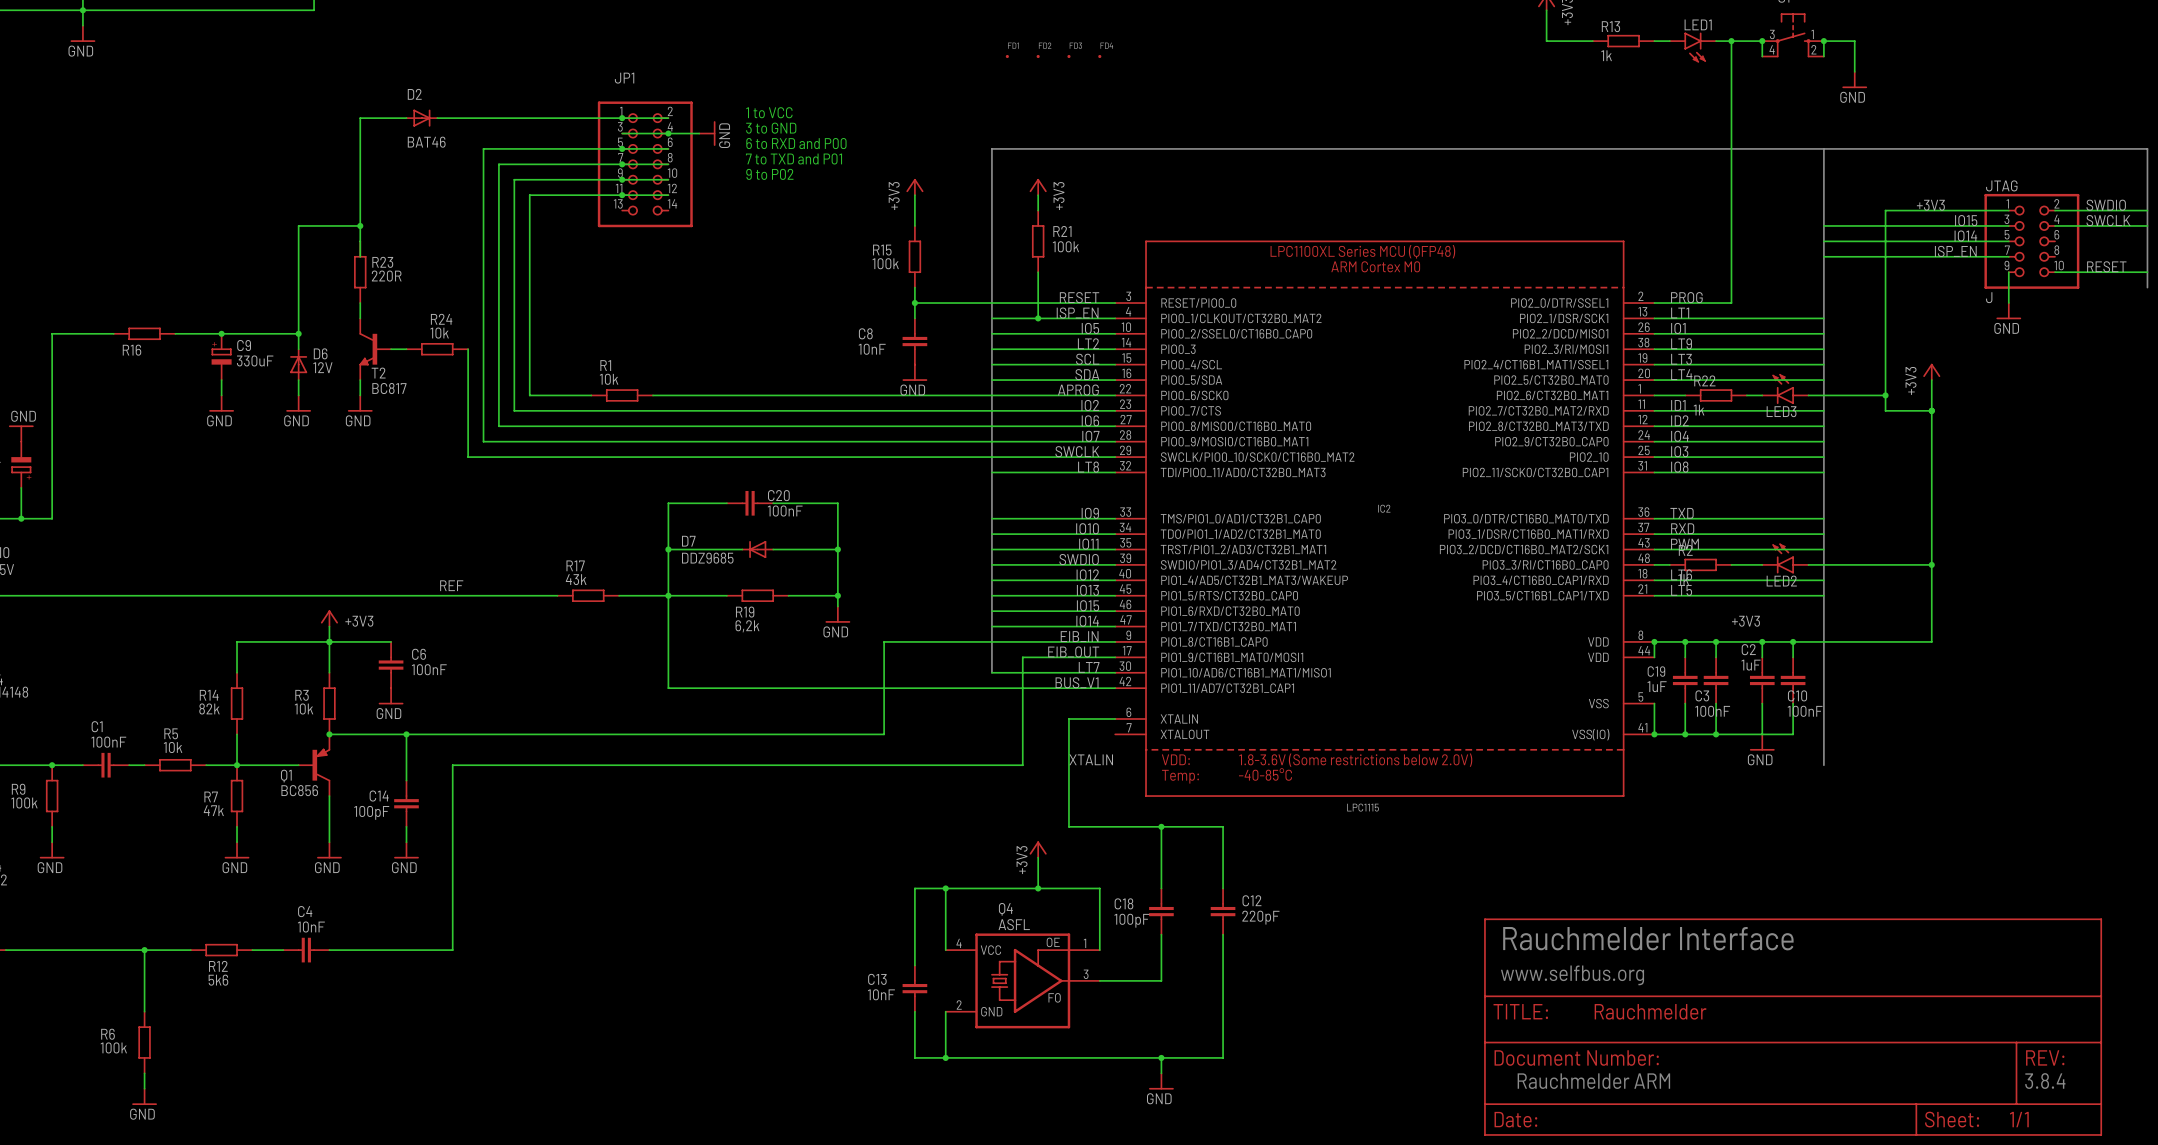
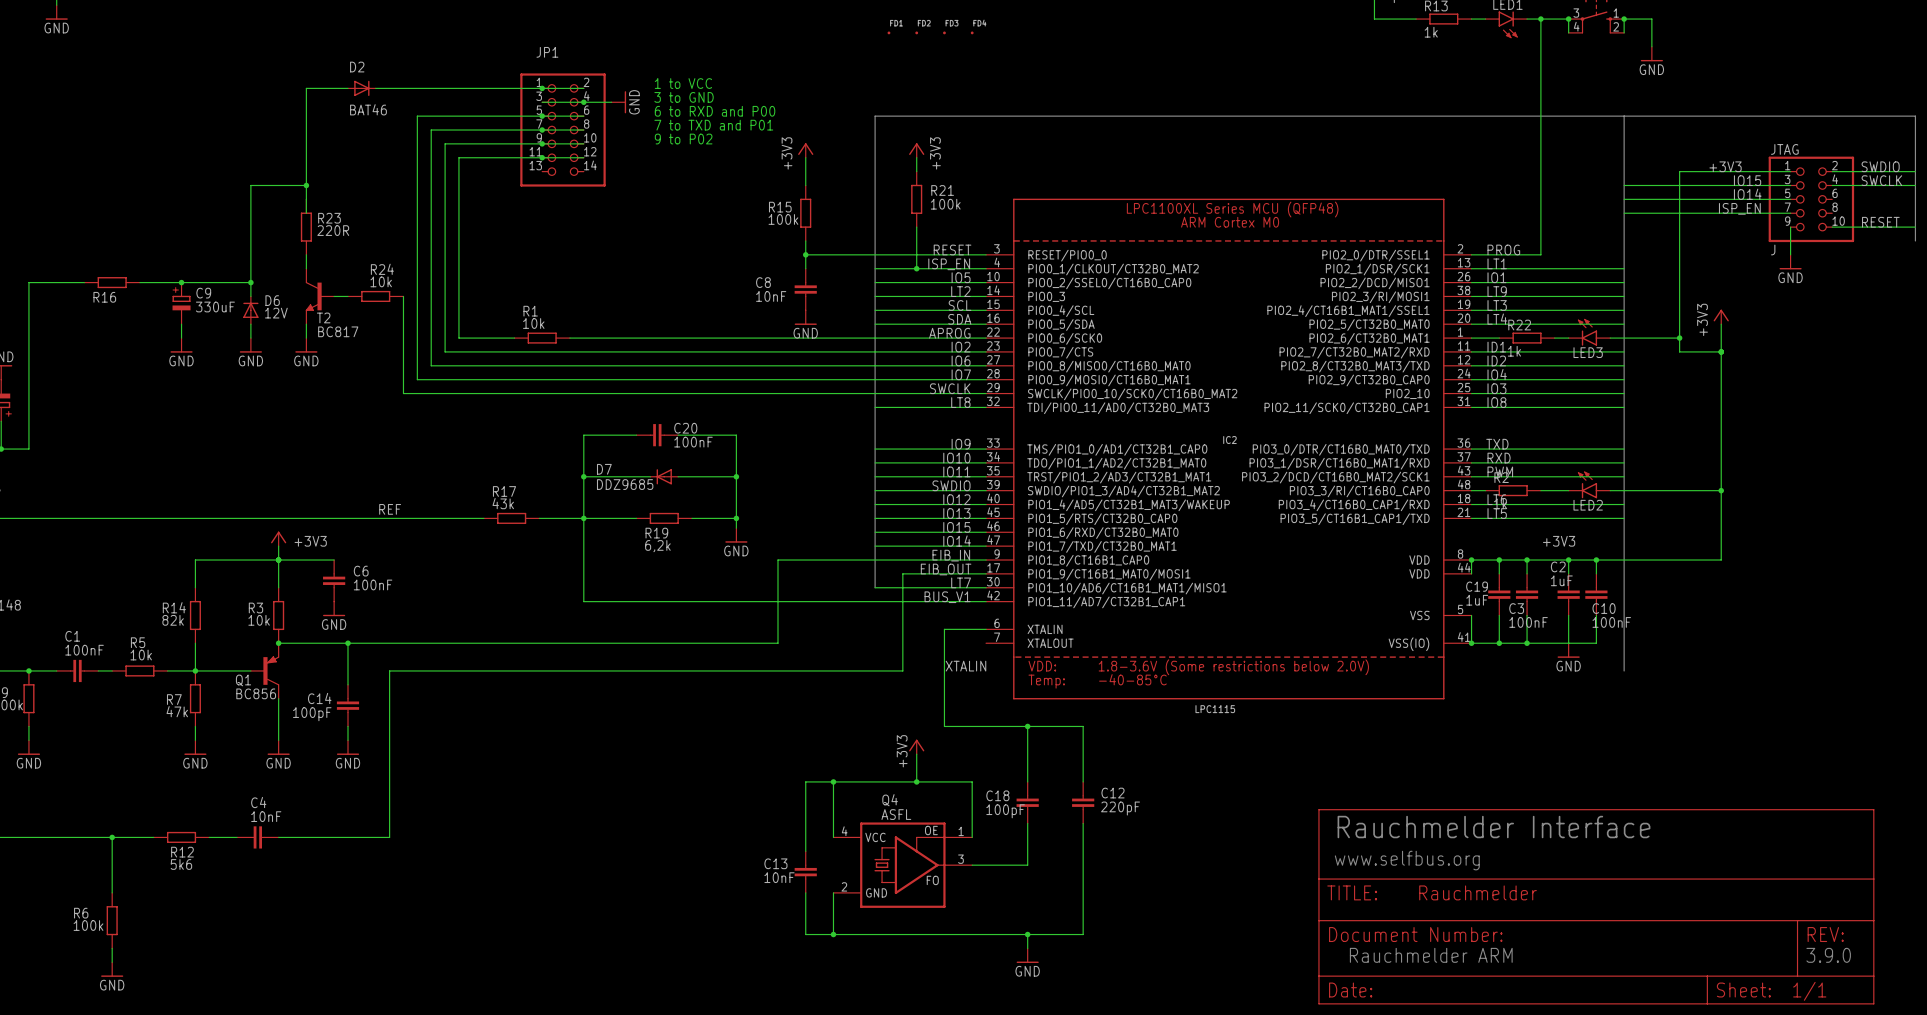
text: 3.8.4 (2045, 1081) -> 3.9.0 (1828, 955)

